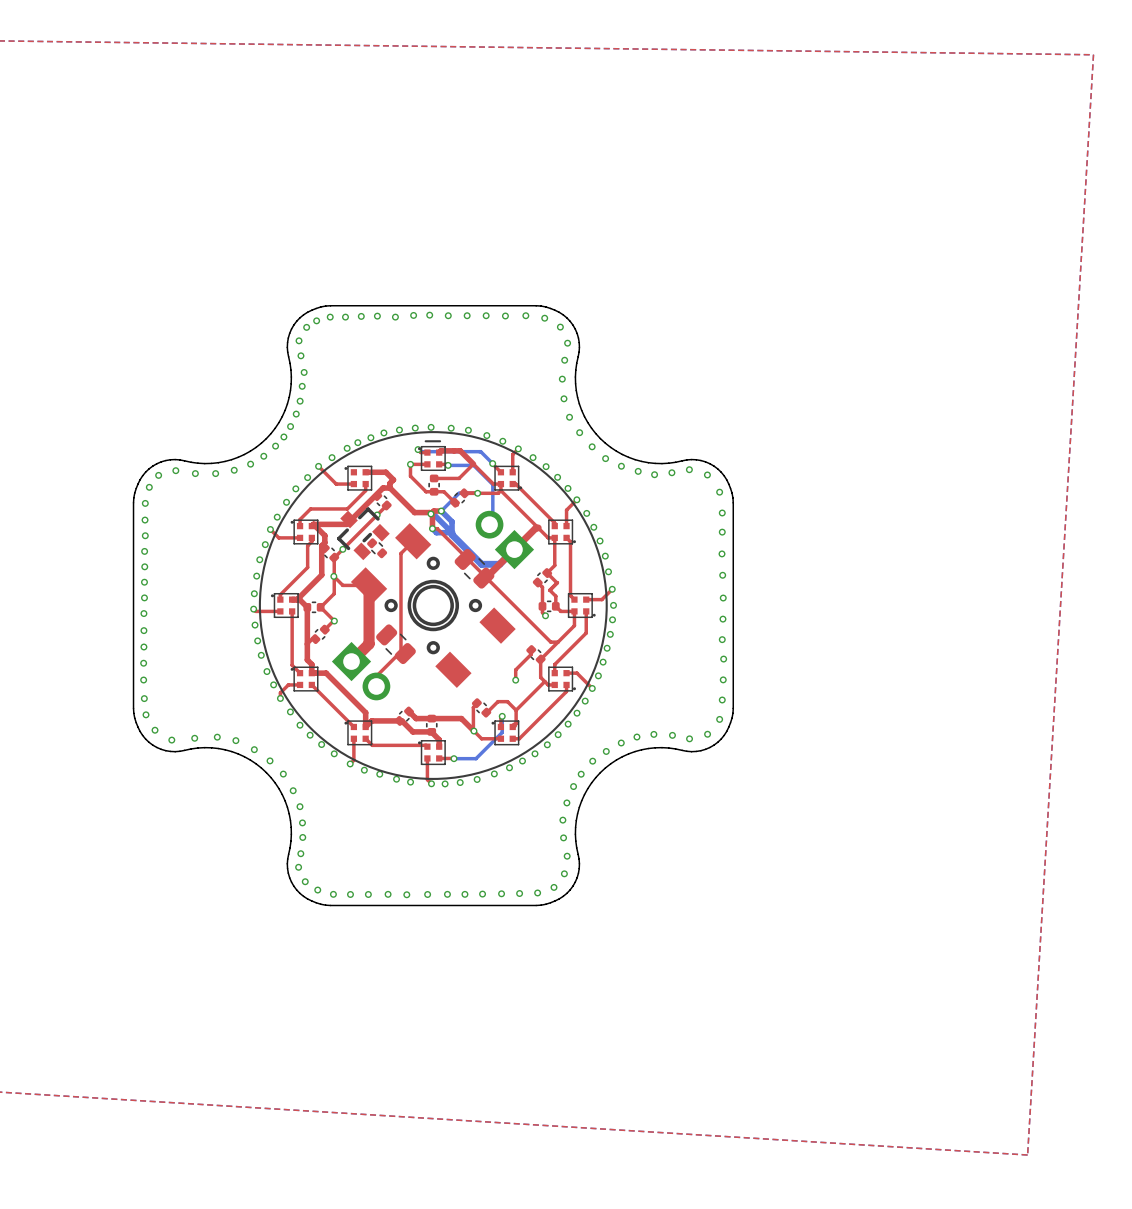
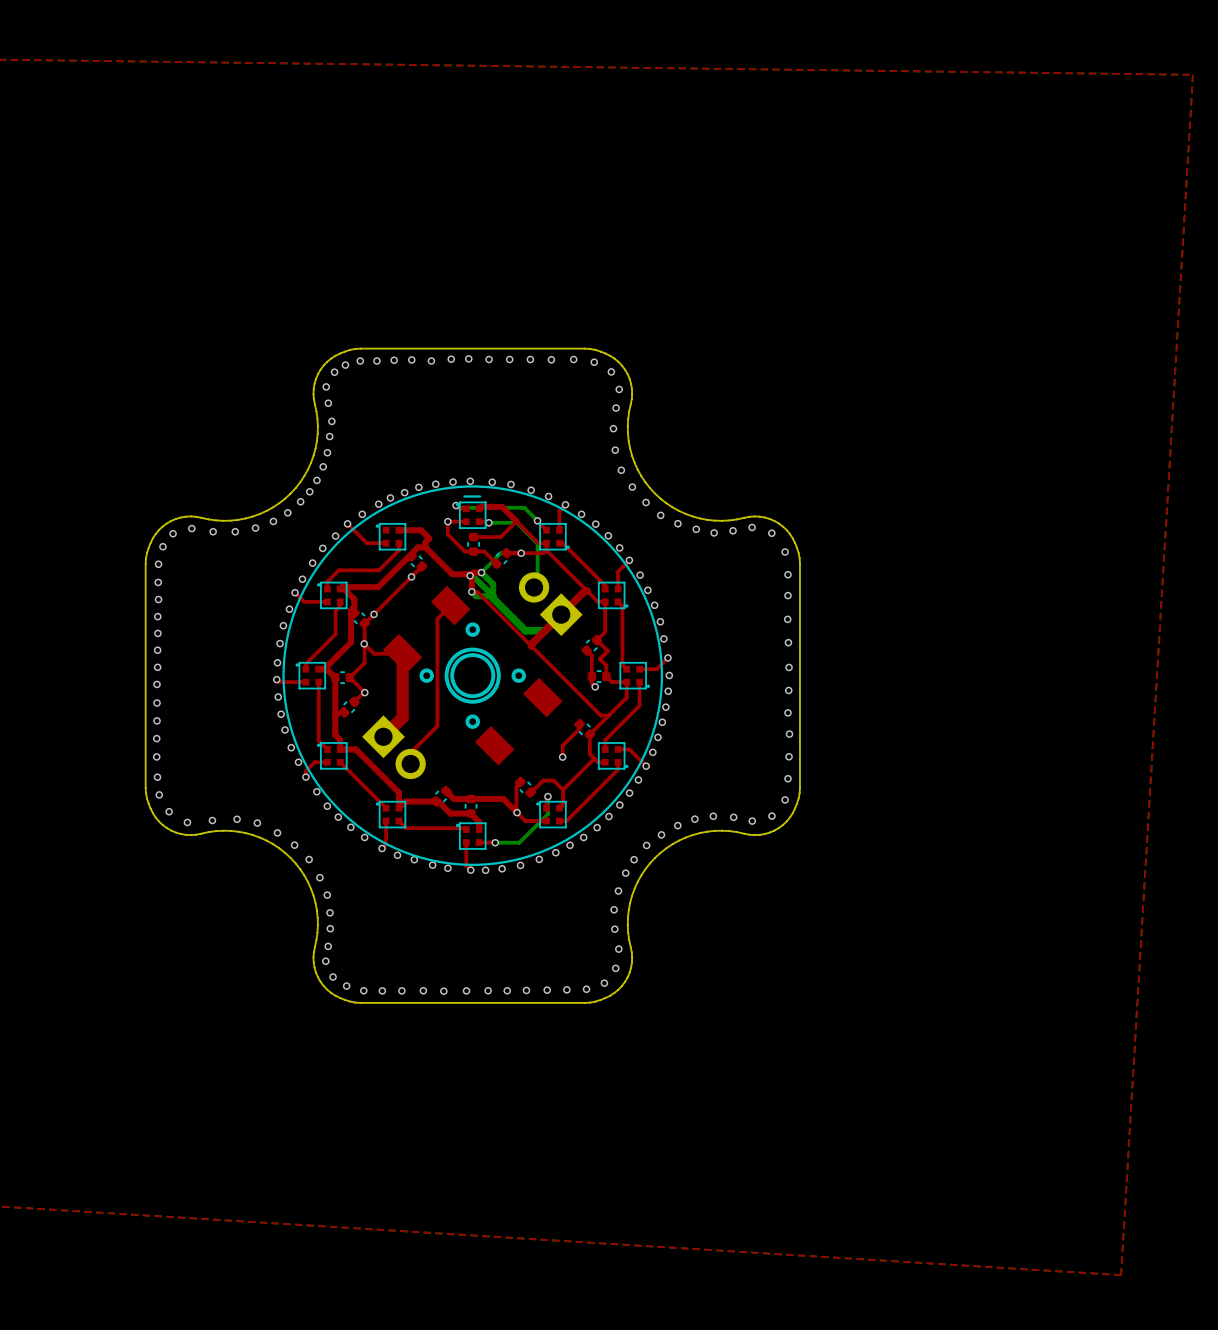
part: (363, 533) -> none
part: (377, 548) -> none
part: (474, 568) -> none
part: (395, 644) -> none

